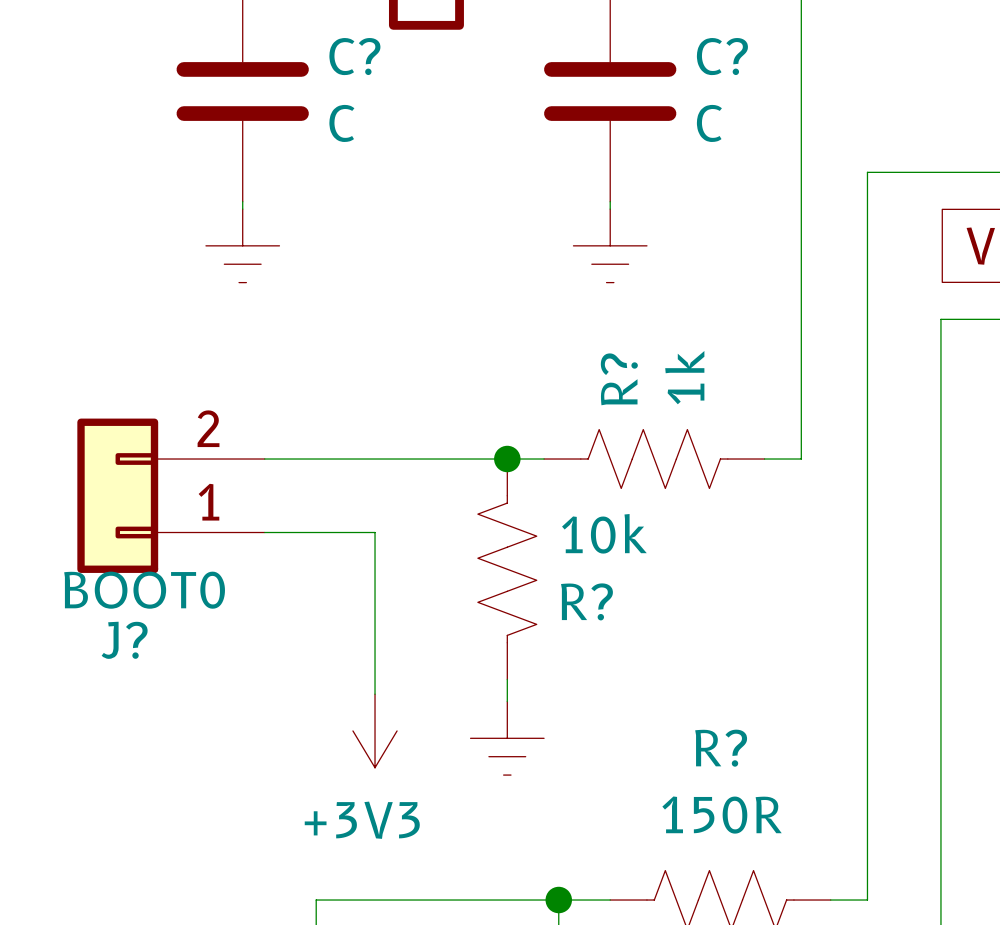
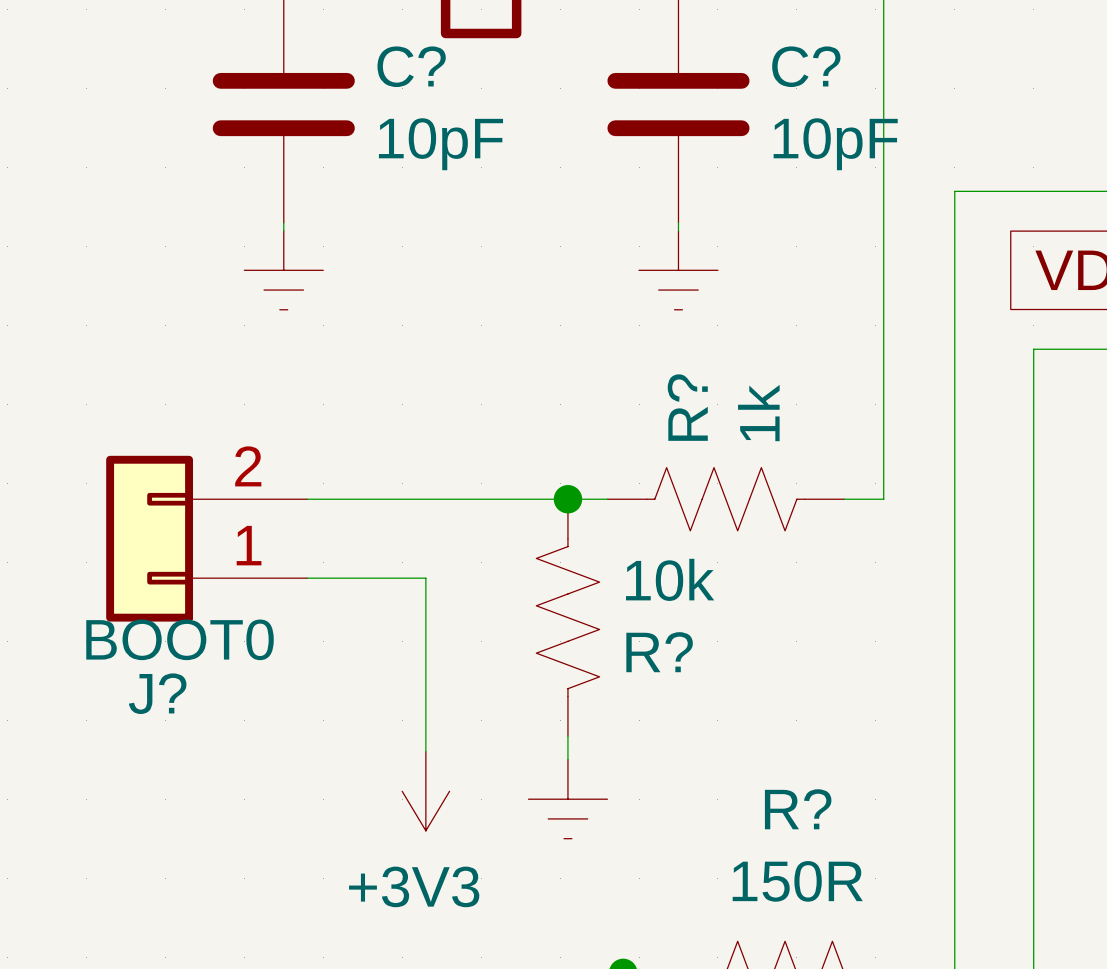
C? value: C (341, 123) -> 10pF (440, 144)
C? value: C (709, 123) -> 10pF (835, 144)

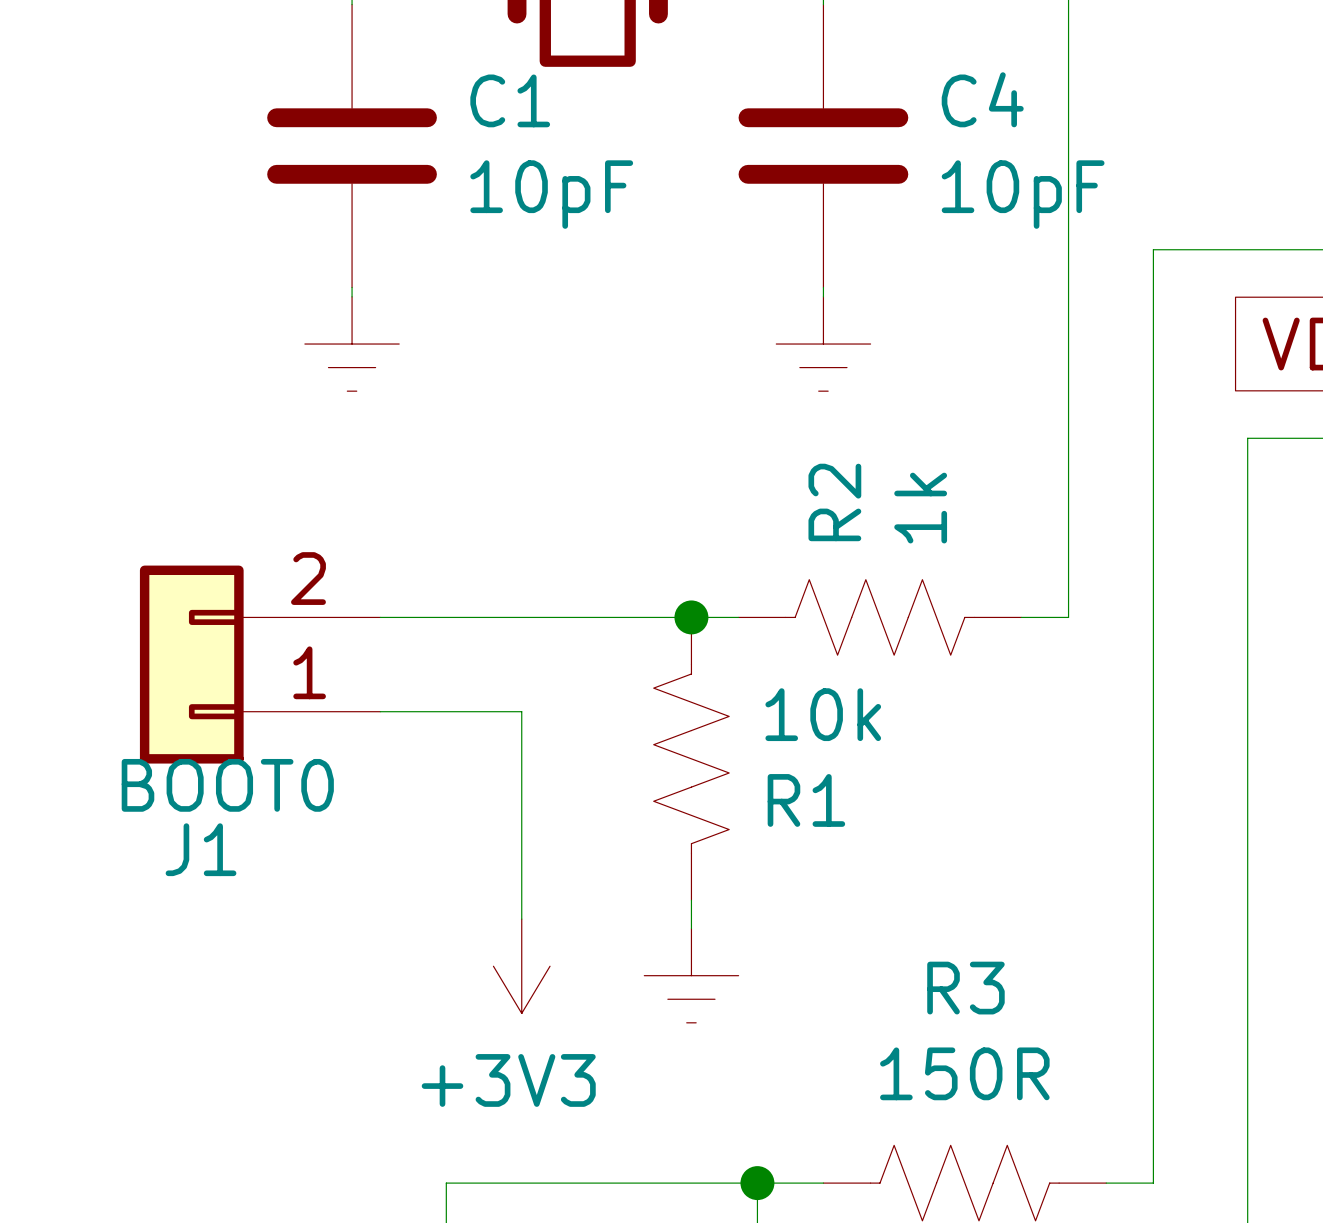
C? name: C? (411, 66) -> C1 (510, 100)
C? name: C? (806, 66) -> C4 (982, 99)
R? name: R? (687, 407) -> R2 (834, 502)
R? name: R? (659, 652) -> R1 (806, 800)
J? name: J? (157, 693) -> J1 (201, 849)
R? name: R? (798, 809) -> R3 (965, 988)

